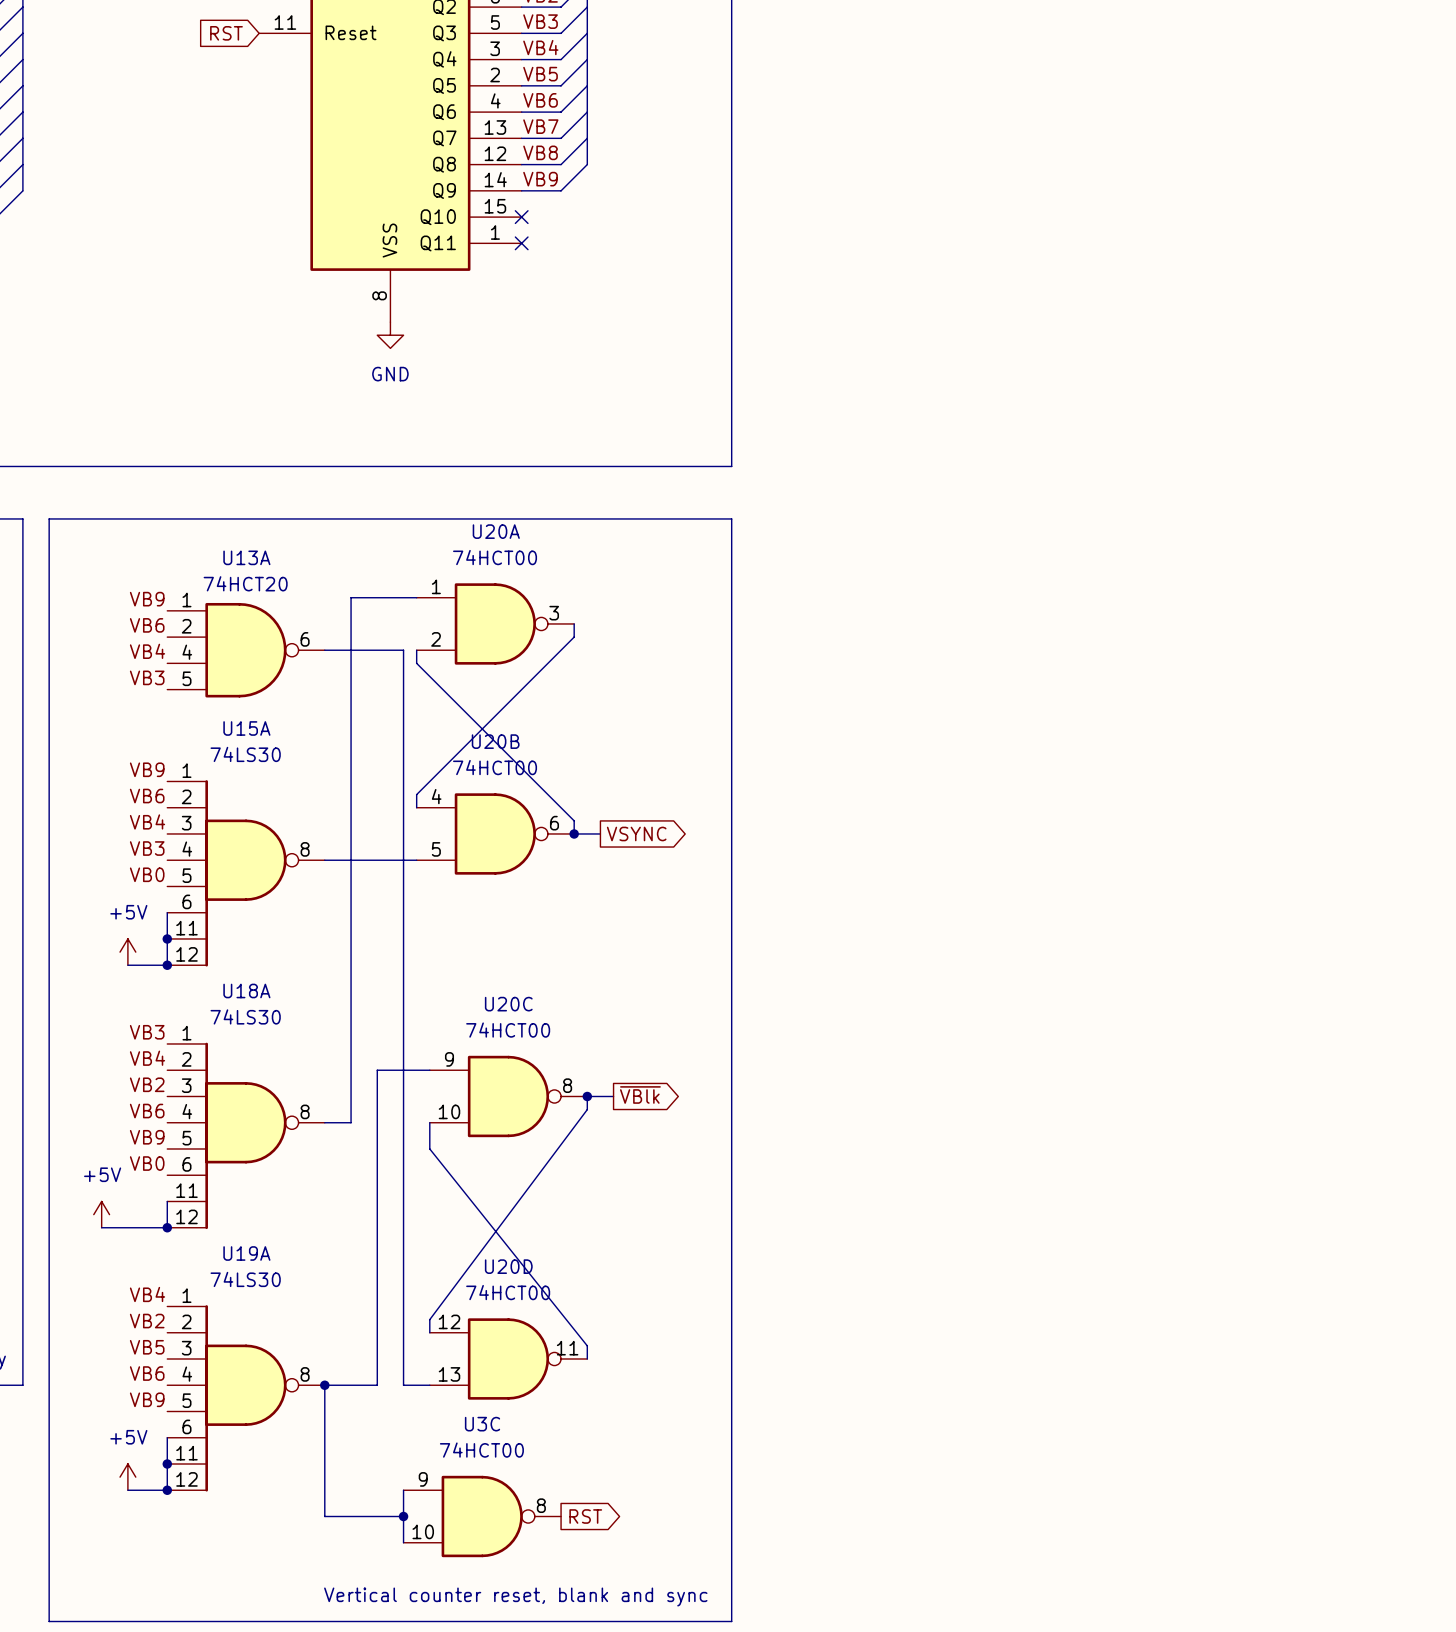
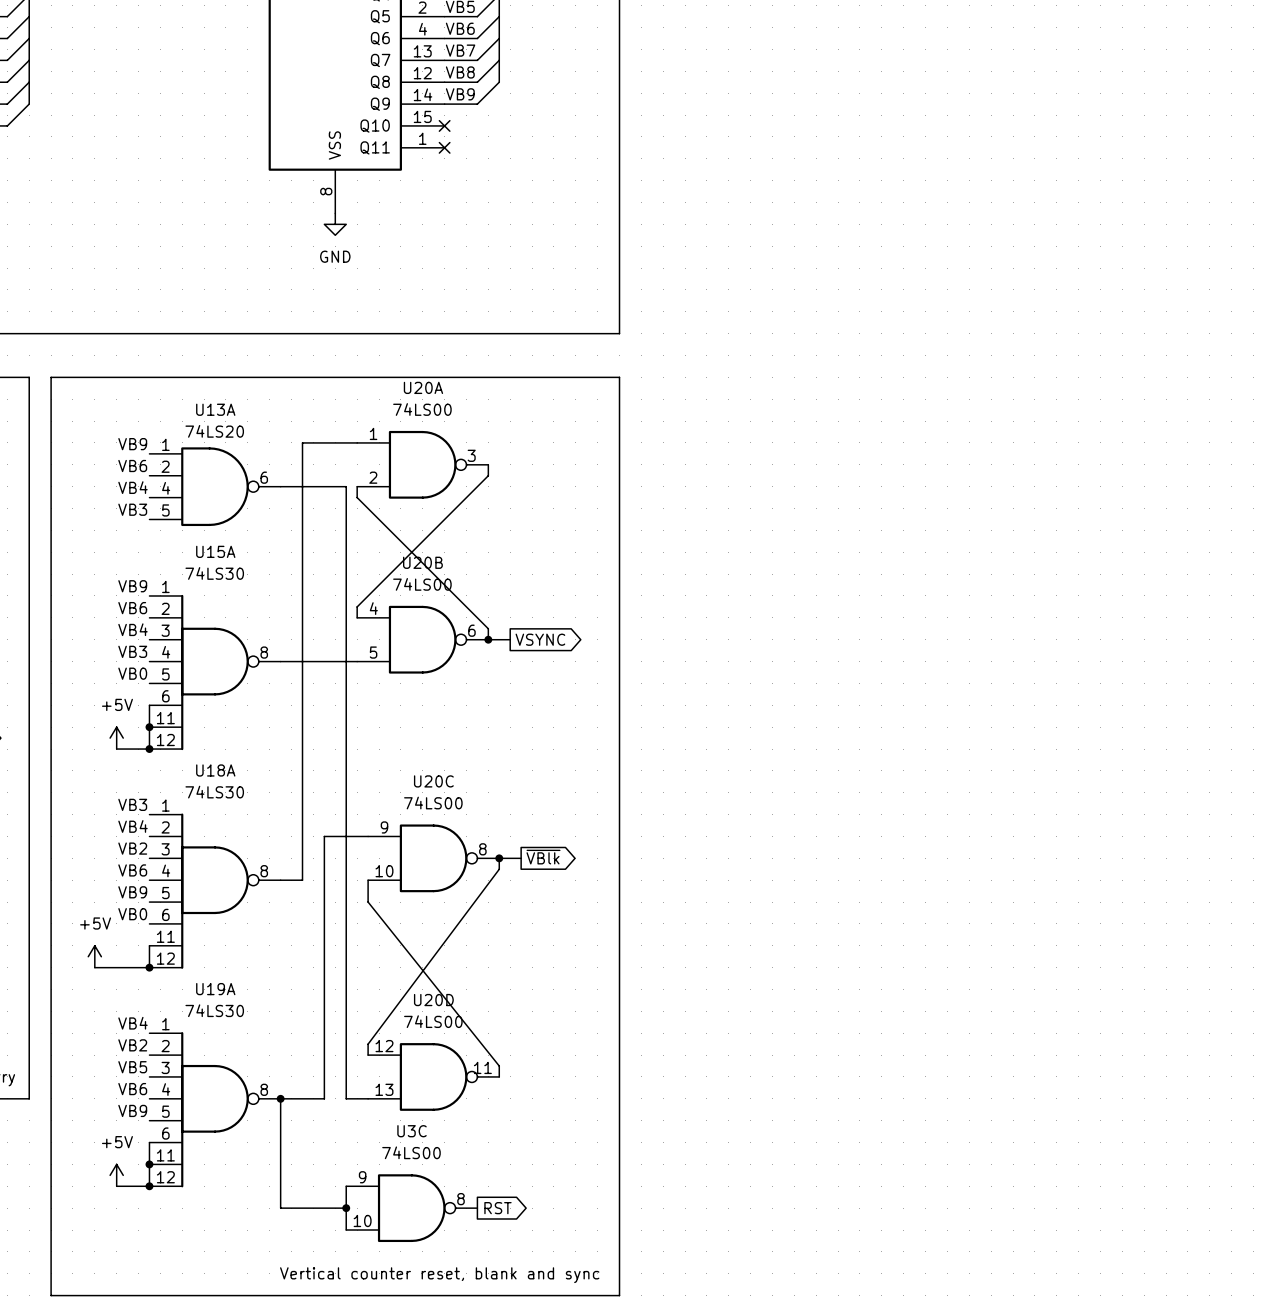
U20A value: 74HCT00 (495, 557) -> 74LS00 (422, 409)
U13A value: 74HCT20 (245, 583) -> 74LS20 (214, 431)
U20B value: 74HCT00 (495, 767) -> 74LS00 (422, 584)
U20C value: 74HCT00 (508, 1030) -> 74LS00 (433, 803)
U20D value: 74HCT00 (508, 1292) -> 74LS00 (433, 1021)
U3C value: 74HCT00 (481, 1450) -> 74LS00 (411, 1152)

